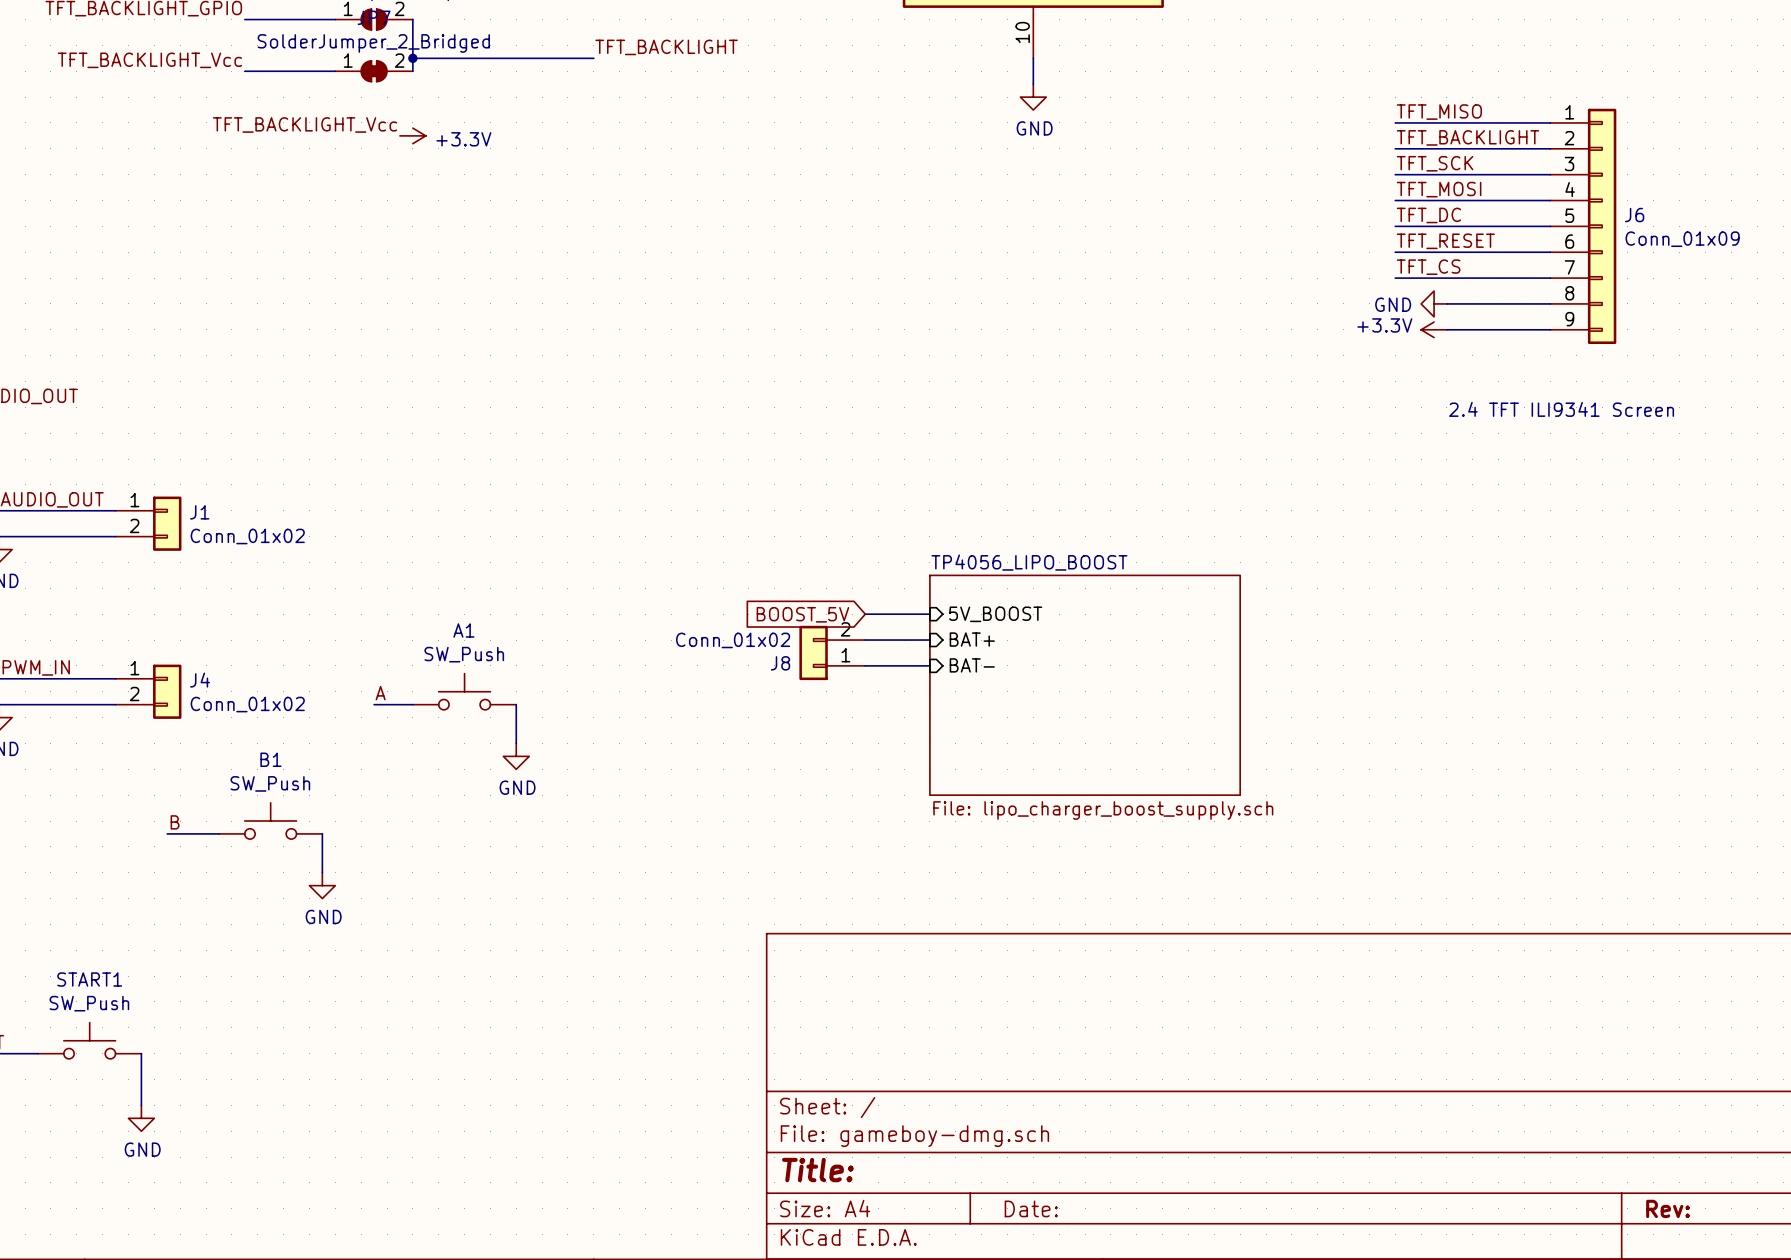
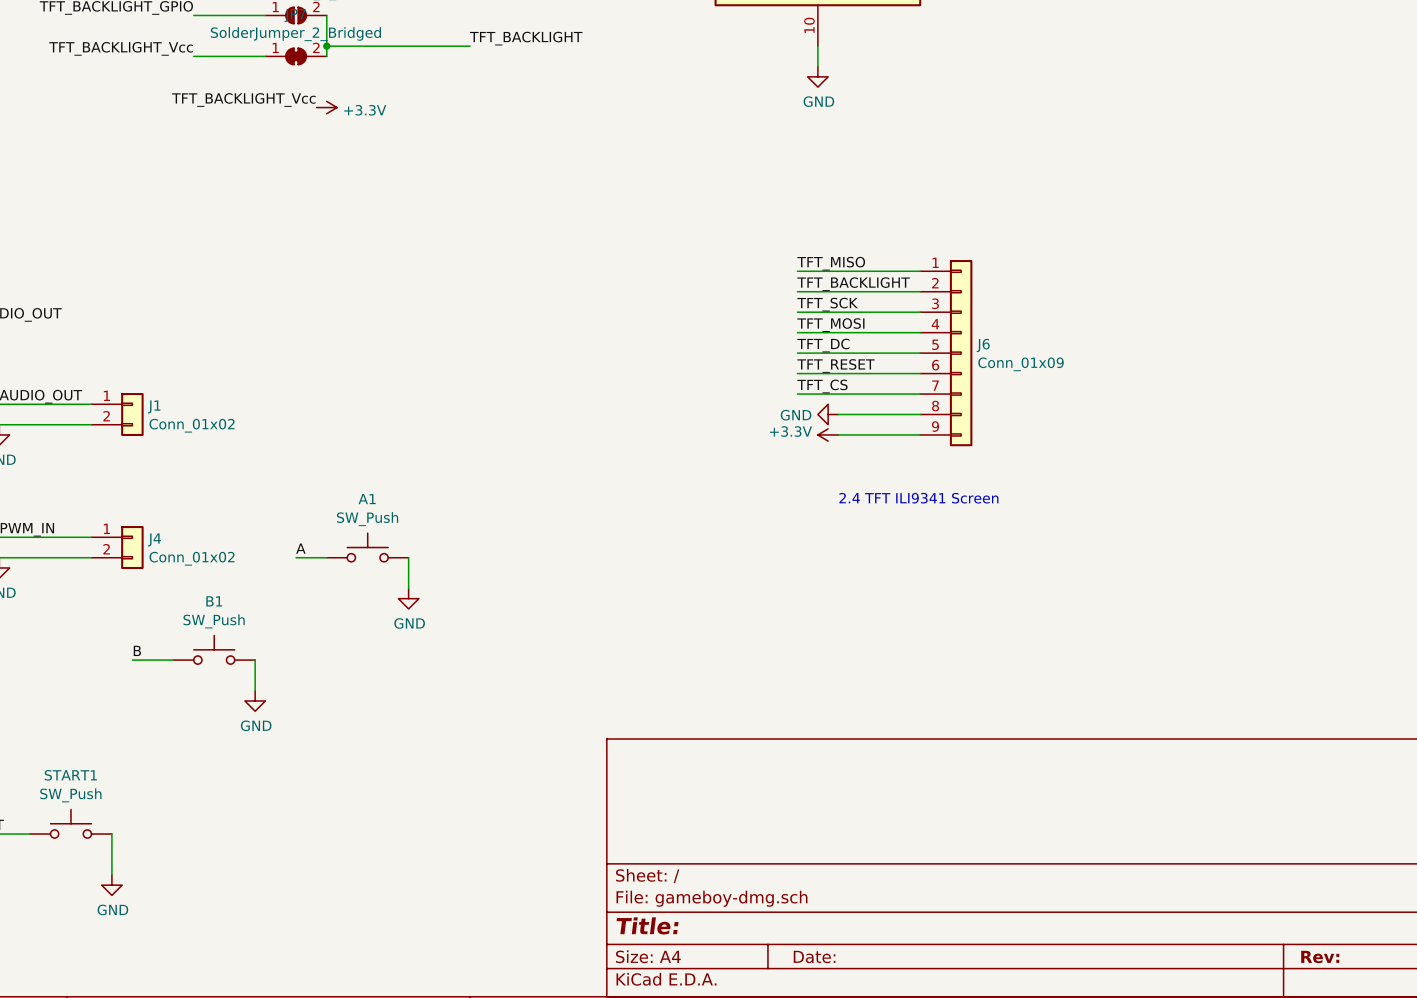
label: TFT_MISO (1439, 112) -> none
wire: (1395, 122) (1550, 122) -> none
label: TFT_BACKLIGHT (1468, 137) -> none
wire: (1395, 148) (1550, 148) -> none
label: TFT_SCK (1435, 163) -> none
wire: (1395, 174) (1550, 174) -> none
label: TFT_MOSI (1439, 189) -> none
wire: (1395, 200) (1550, 200) -> none
label: TFT_DC (1428, 215) -> none
wire: (1395, 226) (1550, 226) -> none
J6 position: (1583, 226) -> (946, 353)
label: TFT_RESET (1445, 241) -> none
wire: (1395, 252) (1550, 252) -> none
label: TFT_CS (1428, 267) -> none
wire: (1395, 278) (1550, 278) -> none
power symbol: GND (1434, 303) -> none
wire: (1446, 303) (1550, 303) -> none
power symbol: +3.3V (1434, 329) -> none
wire: (1446, 329) (1550, 329) -> none
label: none -> TFT_MISO (831, 263)
wire: none -> (797, 271) (920, 271)
label: none -> TFT_BACKLIGHT (853, 284)
wire: none -> (797, 291) (920, 291)
label: none -> TFT_SCK (827, 304)
wire: none -> (797, 312) (920, 312)
label: none -> TFT_MOSI (830, 325)
text: 2.4 TFT ILI9341 Screen (1561, 409) -> none
wire: none -> (797, 332) (920, 332)
label: none -> TFT_DC (823, 345)
wire: none -> (797, 353) (920, 353)
label: none -> TFT_RESET (836, 366)
wire: none -> (797, 373) (920, 373)
label: none -> TFT_CS (822, 386)
wire: none -> (797, 394) (920, 394)
power symbol: none -> GND (828, 414)
wire: none -> (838, 414) (920, 414)
power symbol: none -> +3.3V (828, 434)
wire: none -> (838, 434) (920, 434)
global label: BOOST_5V (802, 614) -> none
wire: (865, 614) (929, 614) -> none
sheet pin: 5V_BOOST (995, 614) -> none
text: none -> 2.4 TFT ILI9341 Screen (918, 498)
sheet pin: BAT+ (972, 639) -> none
wire: (865, 640) (929, 640) -> none
J8: Conn_01x02 (832, 652) -> none
wire: (865, 665) (929, 665) -> none
sheet pin: BAT- (972, 665) -> none
sheet TP4056_LIPO_BOOST: File: lipo_charger_boost_supply.sch (1085, 685) -> none

